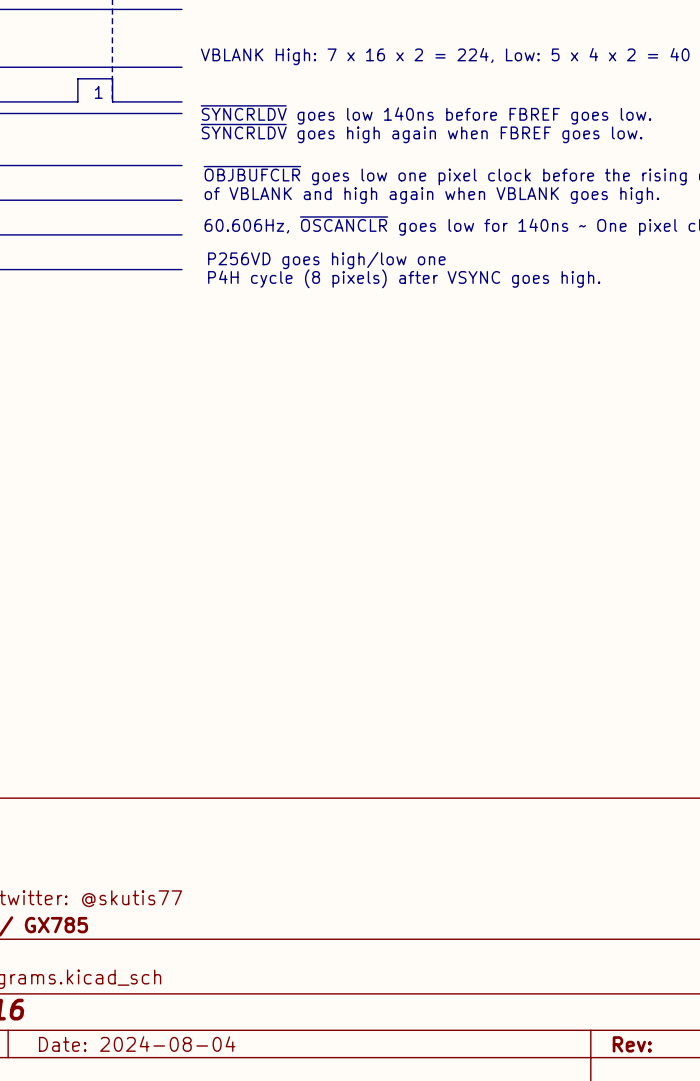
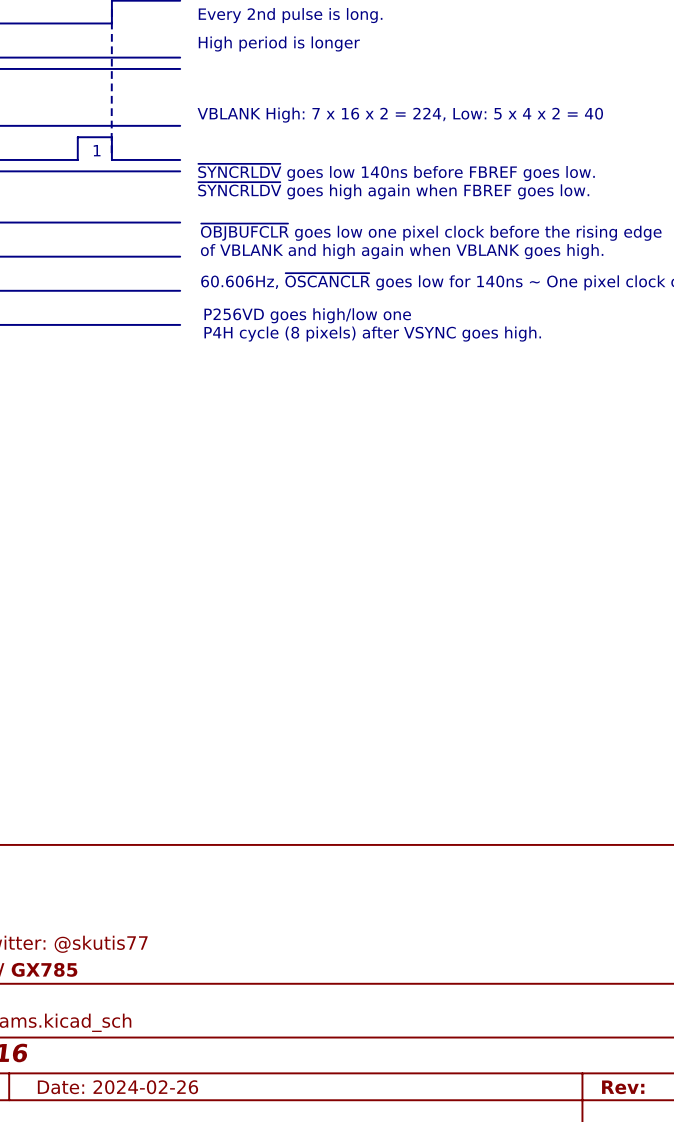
title block: Date: 2024-08-04 (137, 1044) -> Date: 2024-02-26 (117, 1087)

